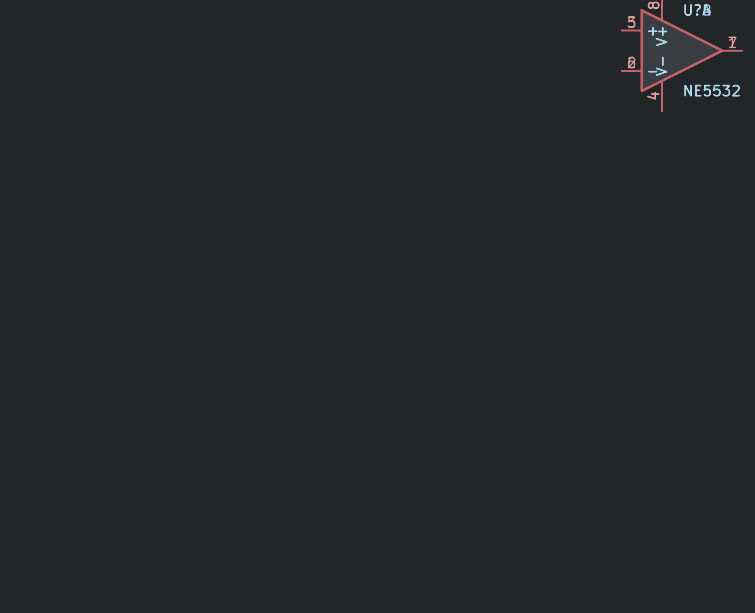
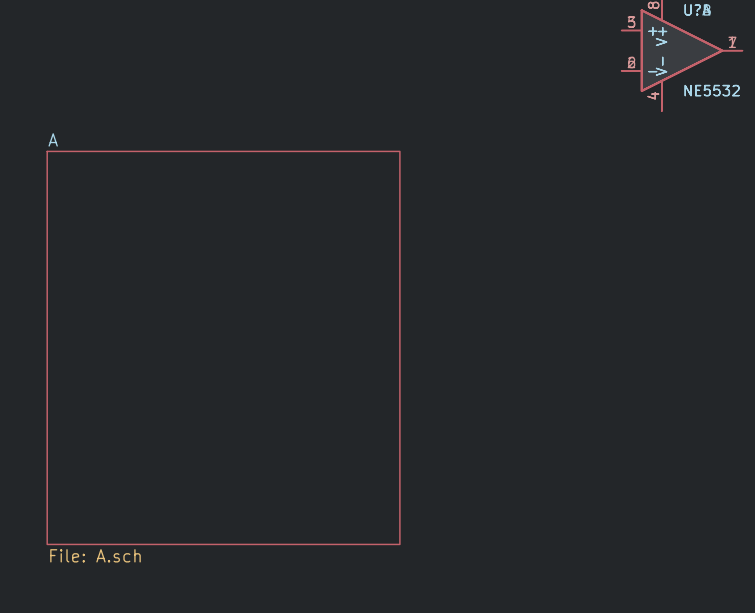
sheet A: none -> File: A.sch (223, 347)

